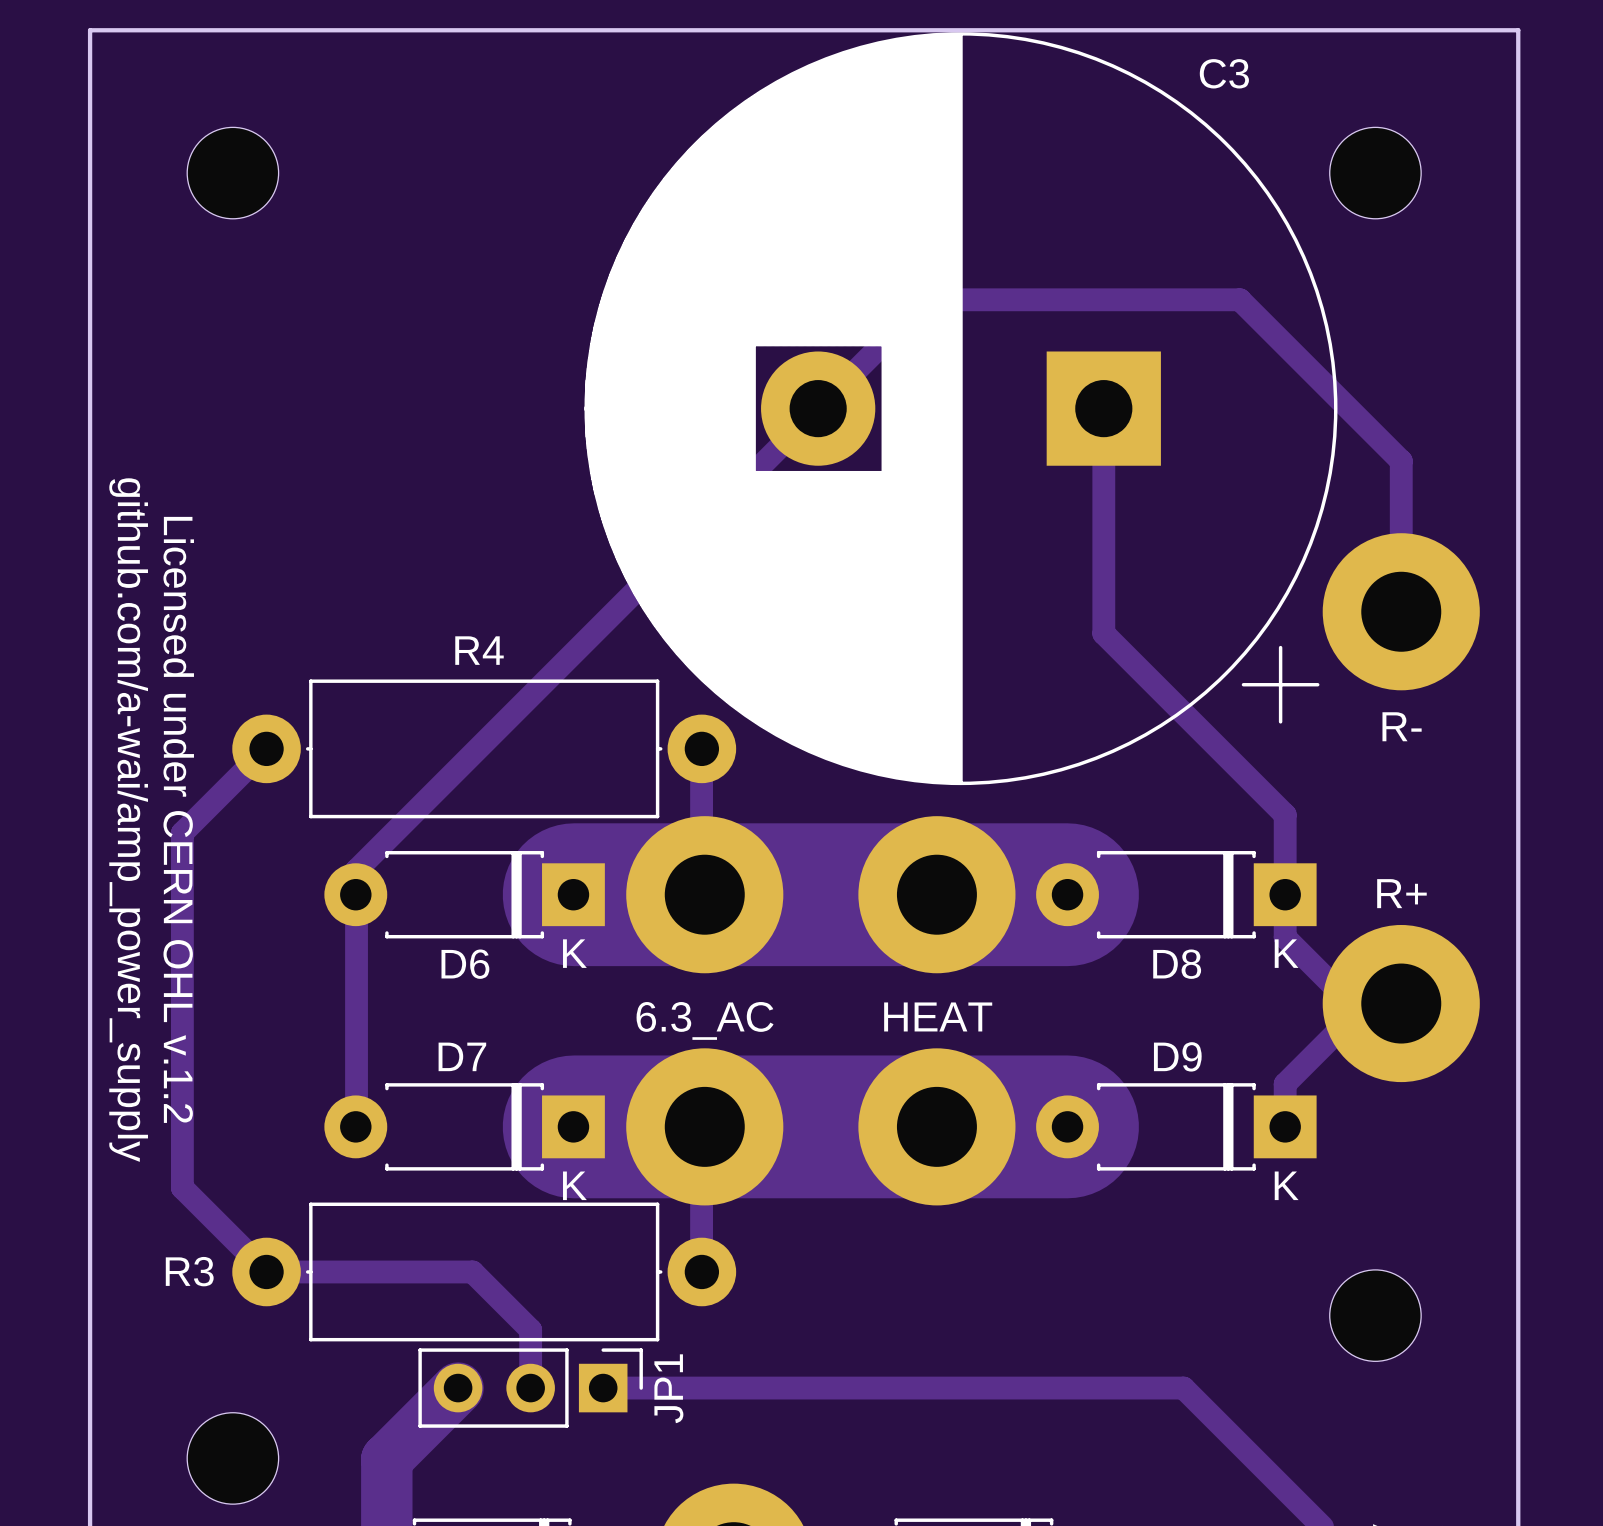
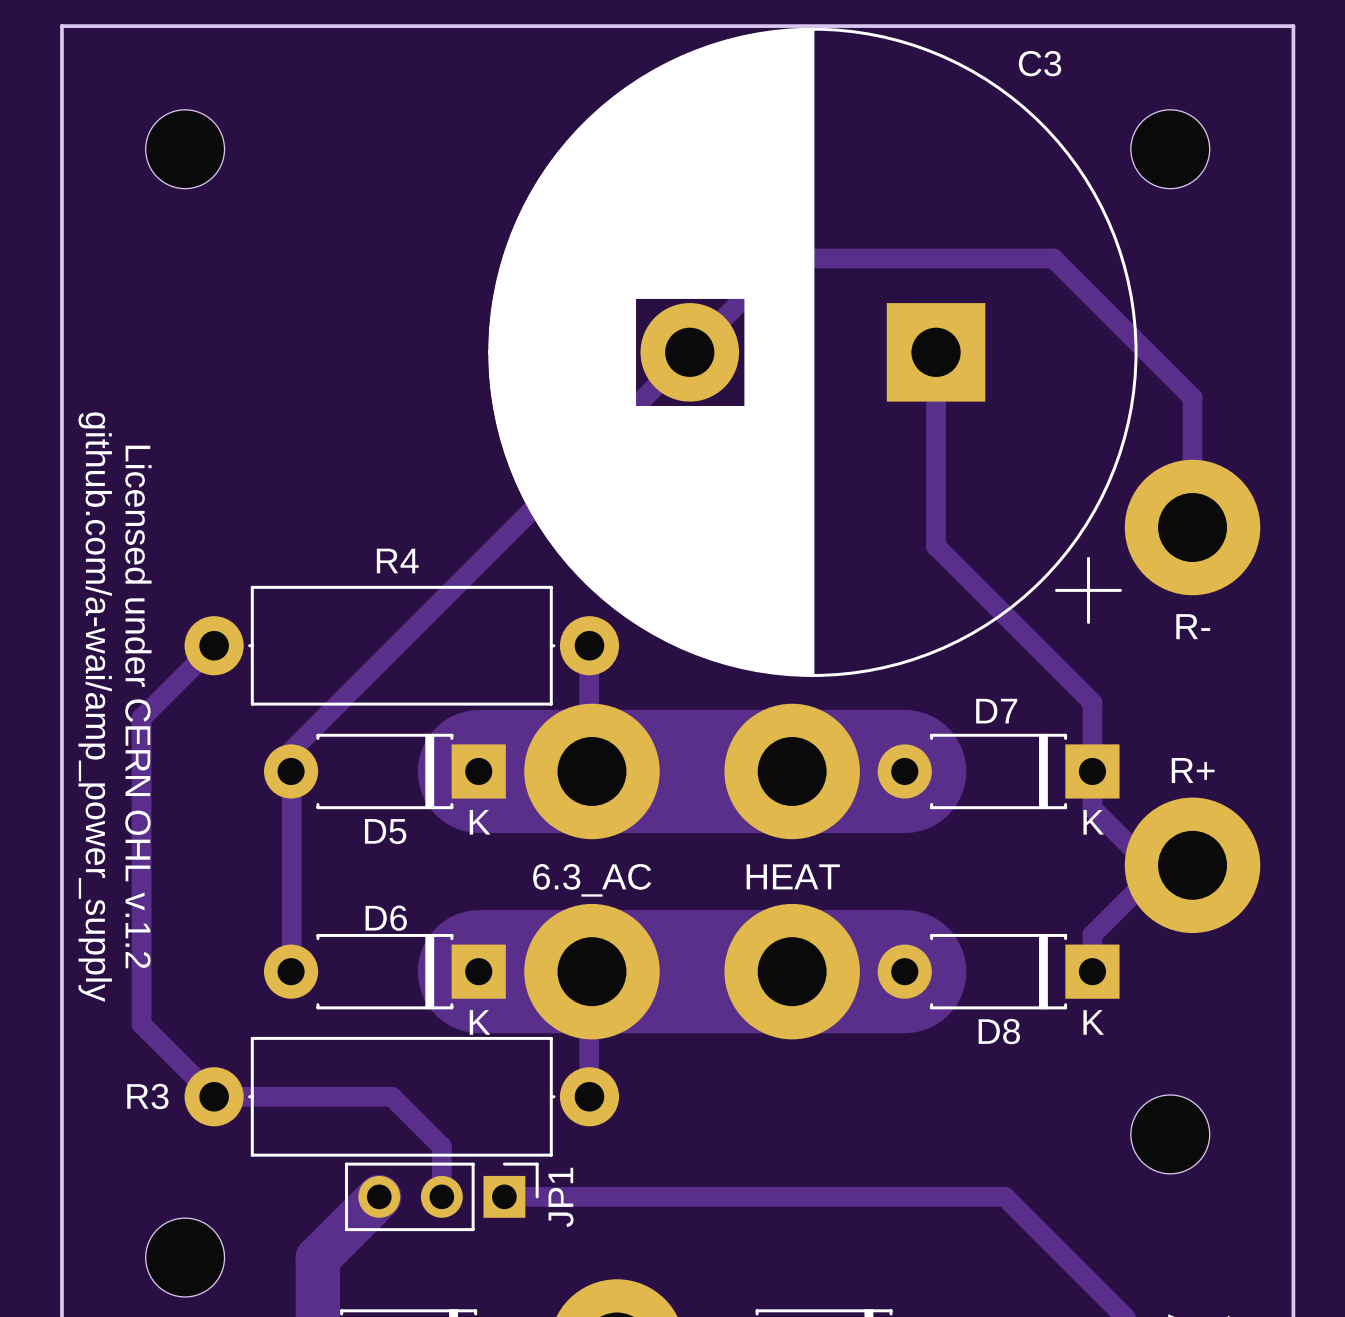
D6 name: D6 (465, 964) -> D5 (385, 831)
D8 name: D8 (1177, 964) -> D7 (996, 711)
D7 name: D7 (462, 1056) -> D6 (386, 918)
D9 name: D9 (1177, 1056) -> D8 (999, 1031)

